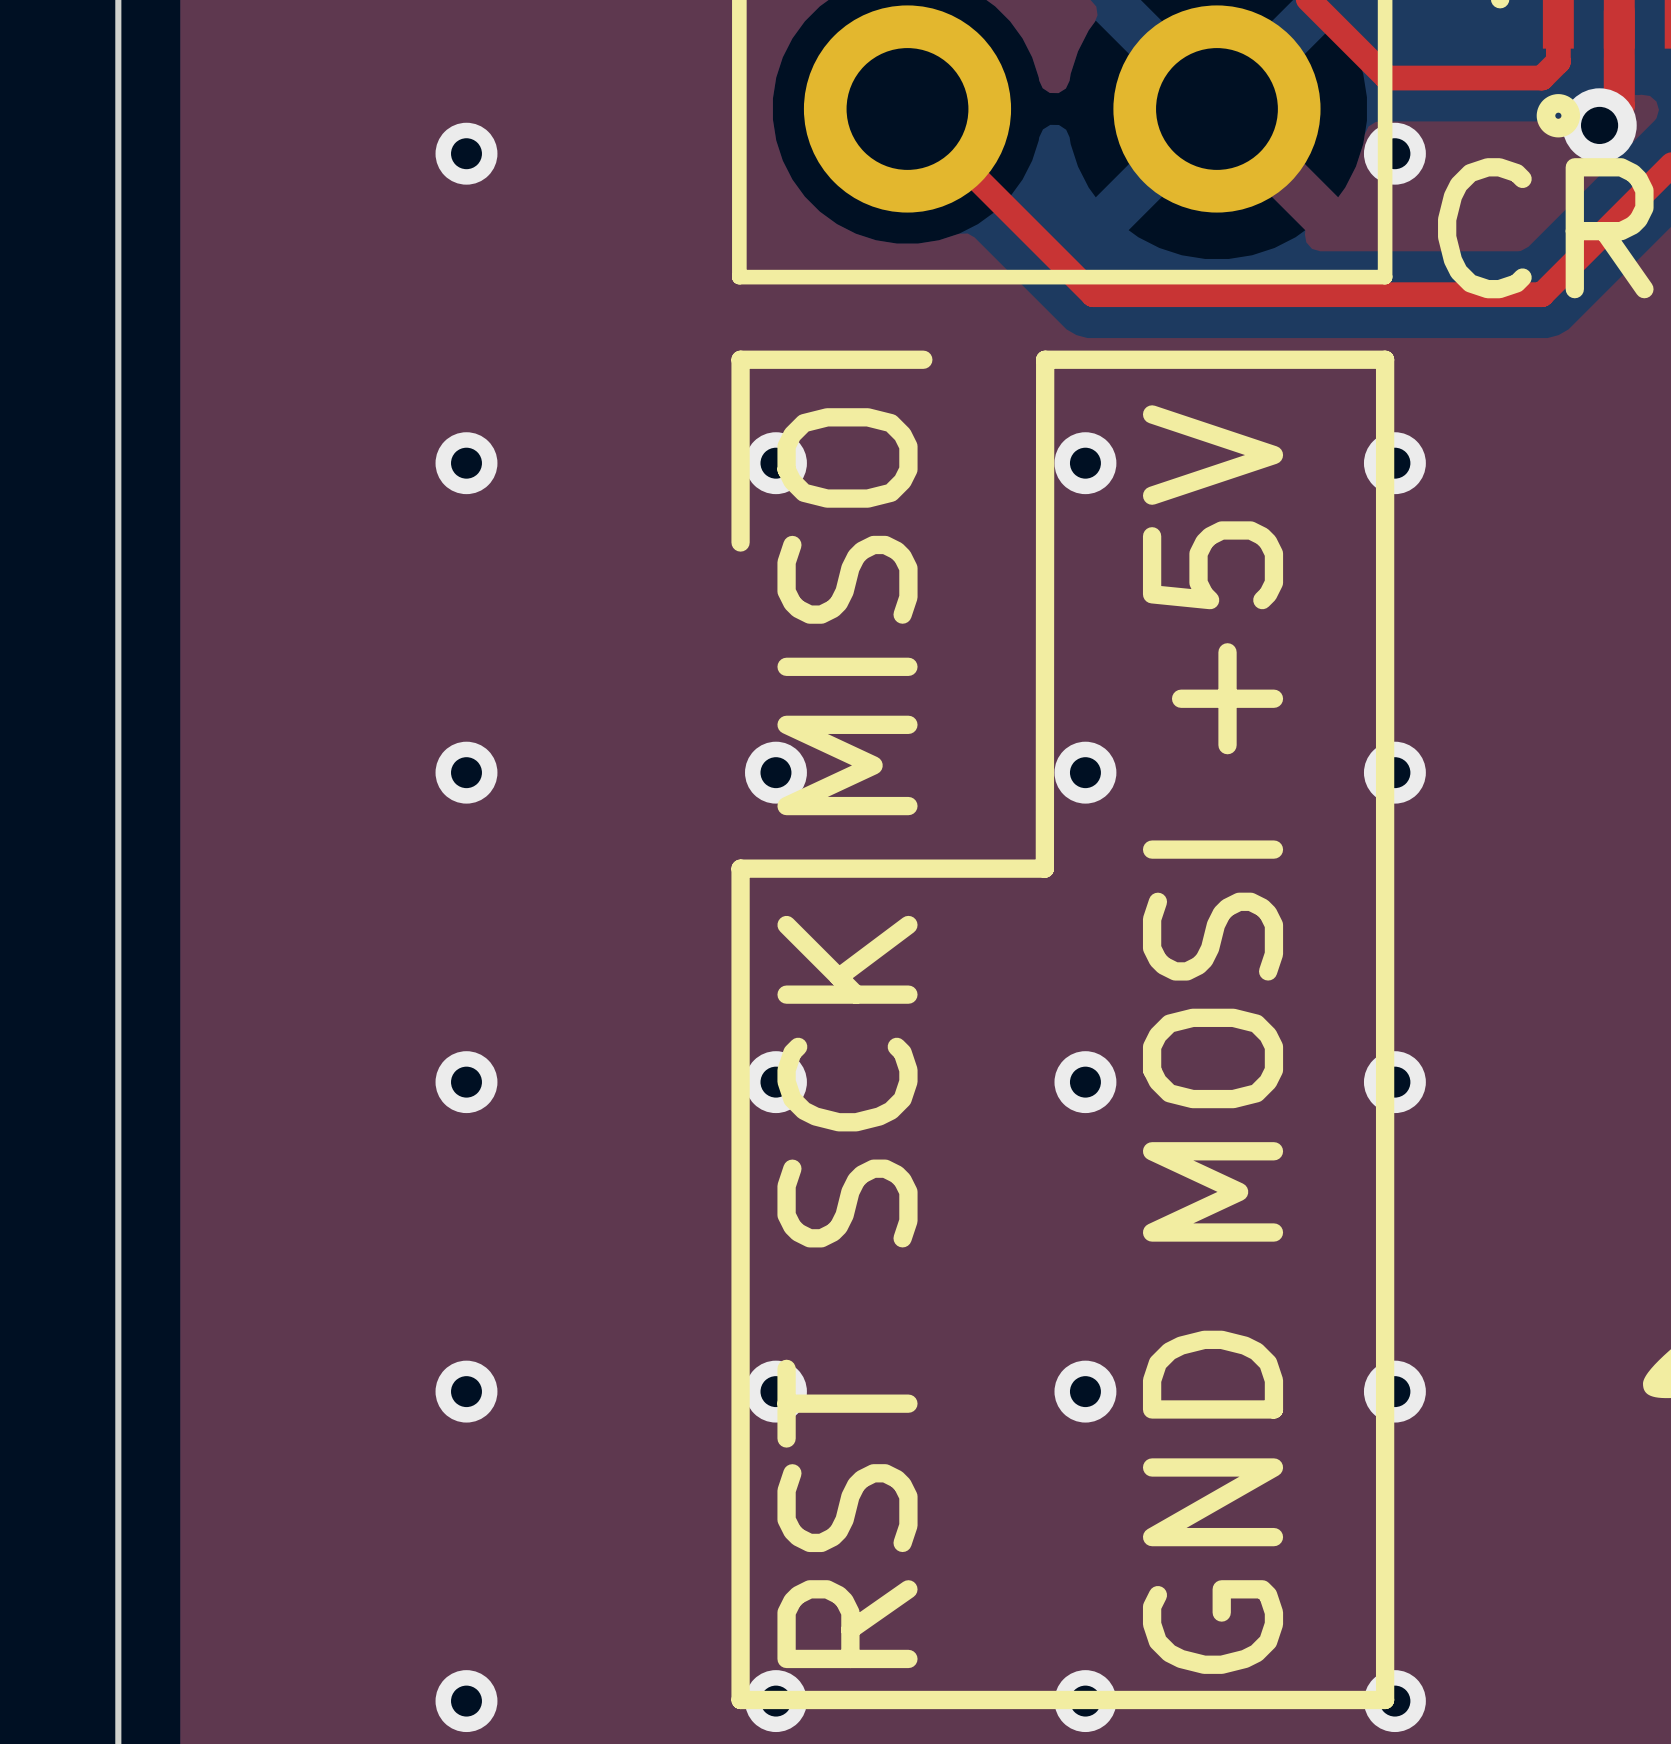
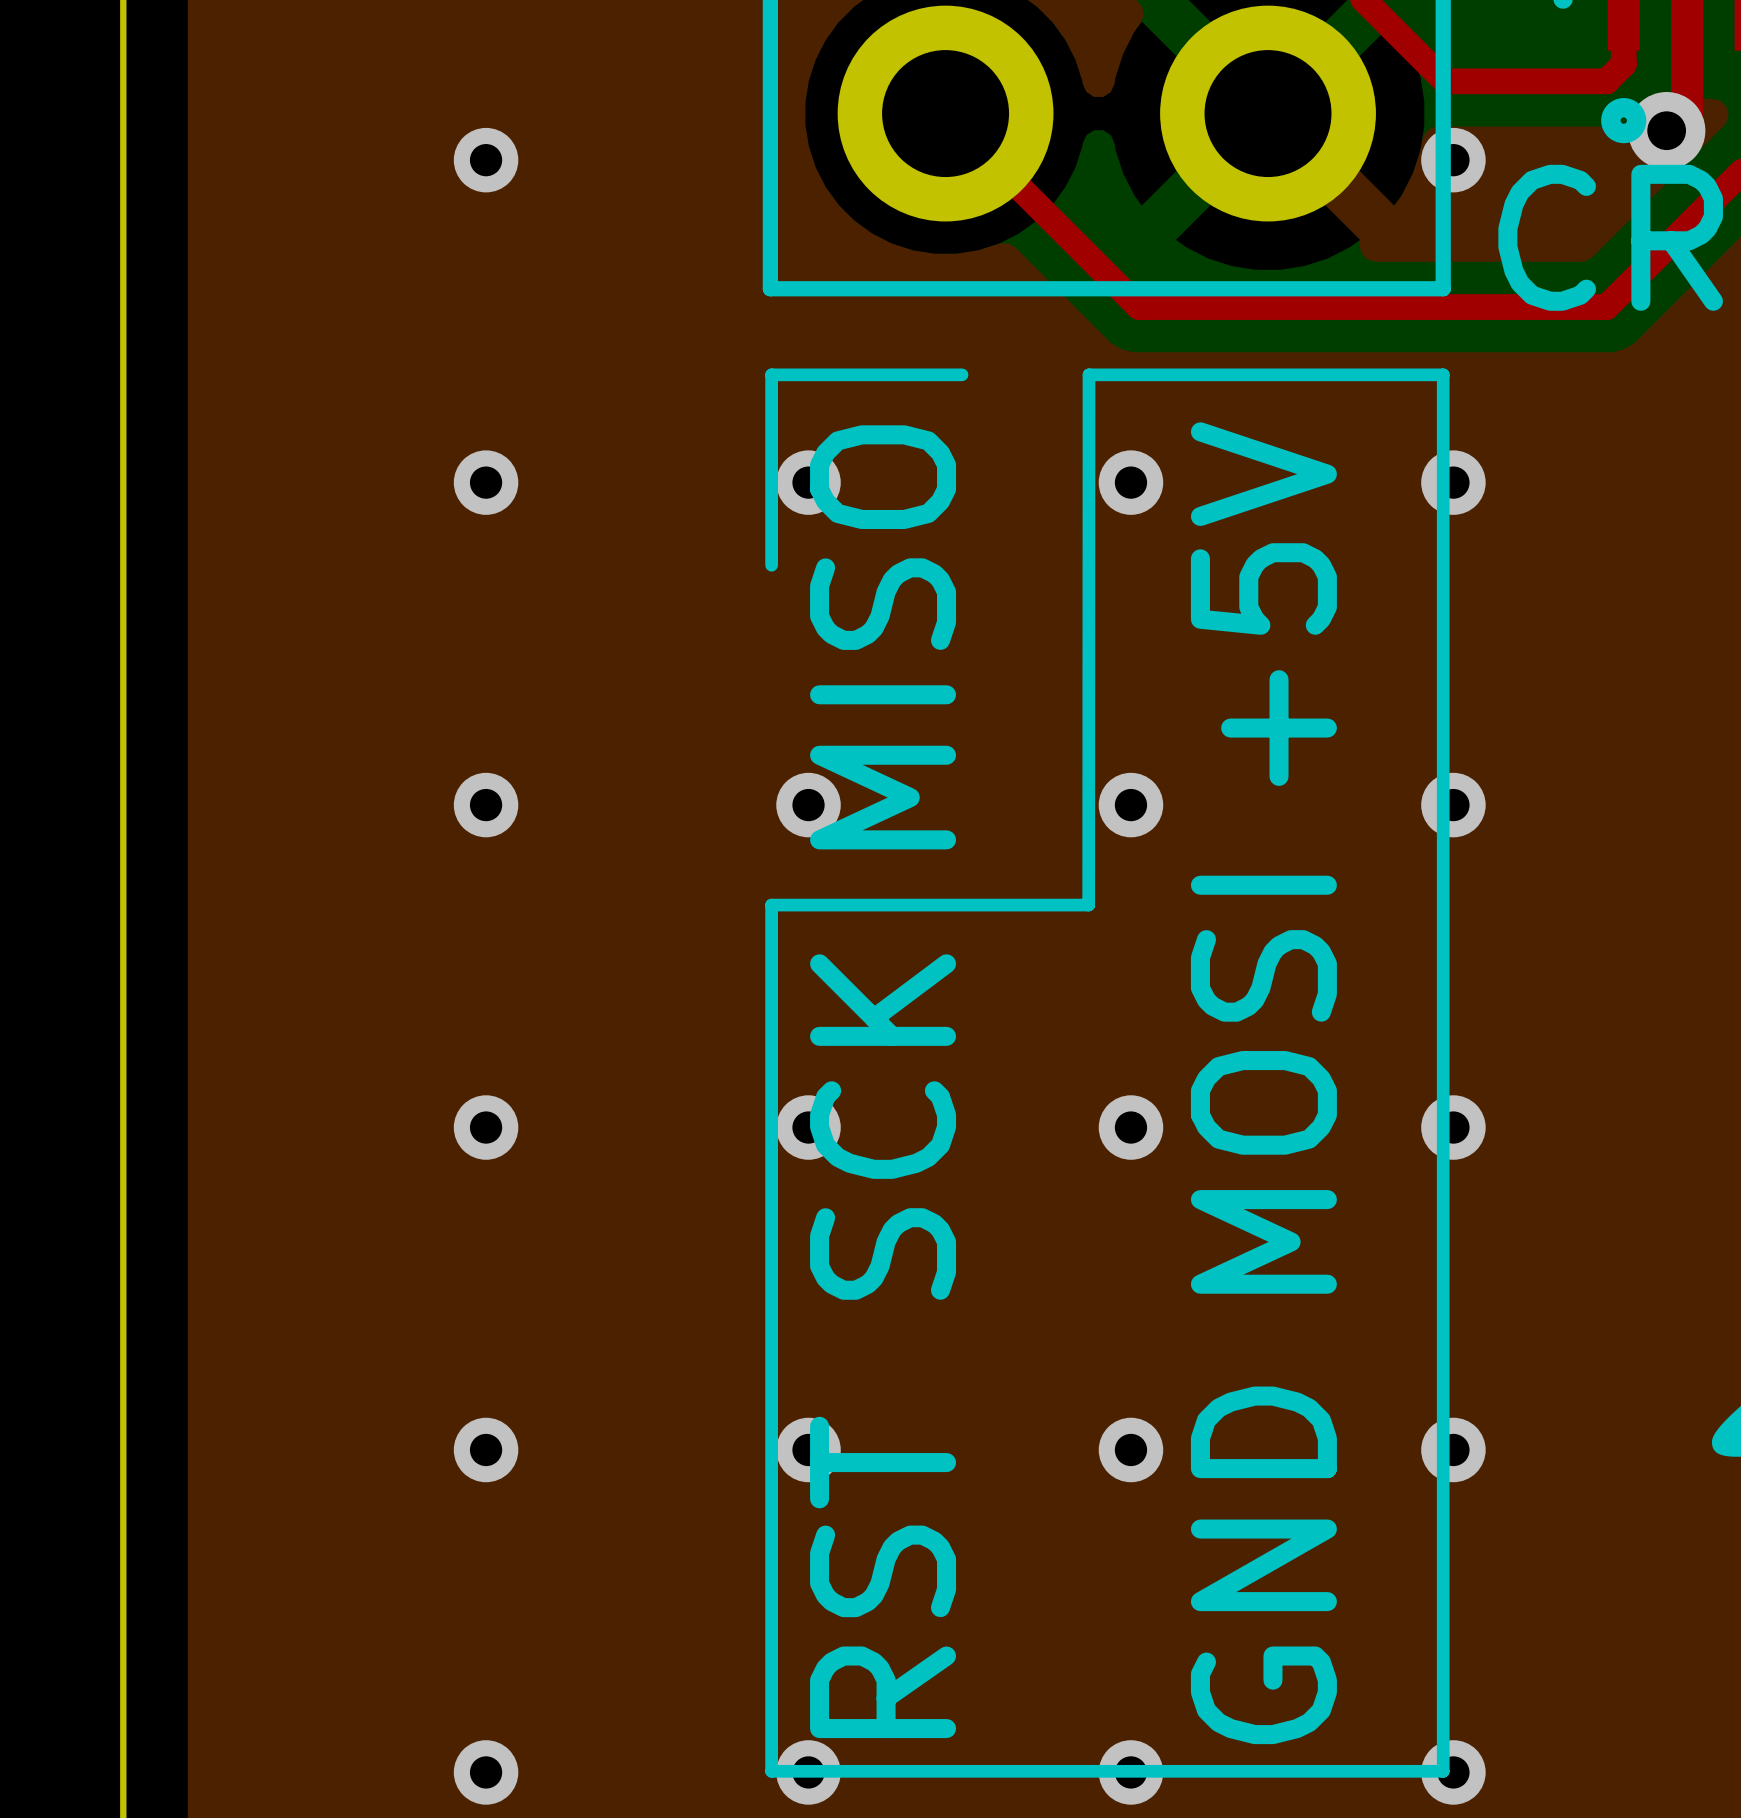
line width: thick (923, 359) (740, 359) (740, 542) -> thin (962, 374) (771, 374) (771, 565)
line width: thick (1045, 359) (1385, 359) (1385, 1699) (740, 1699) (740, 868) (1044, 868) (1045, 359) -> thin (1089, 374) (1443, 374) (1443, 1771) (771, 1771) (771, 905) (1088, 905) (1089, 374)

